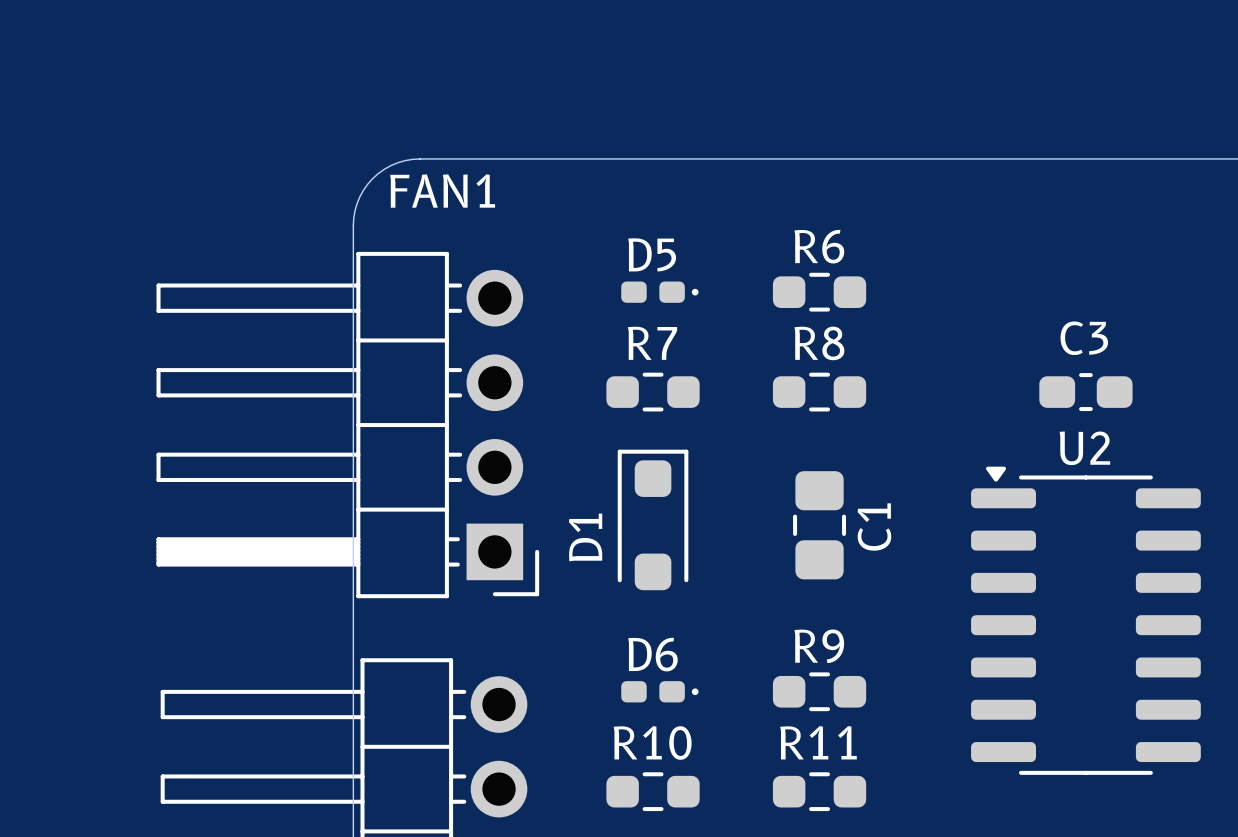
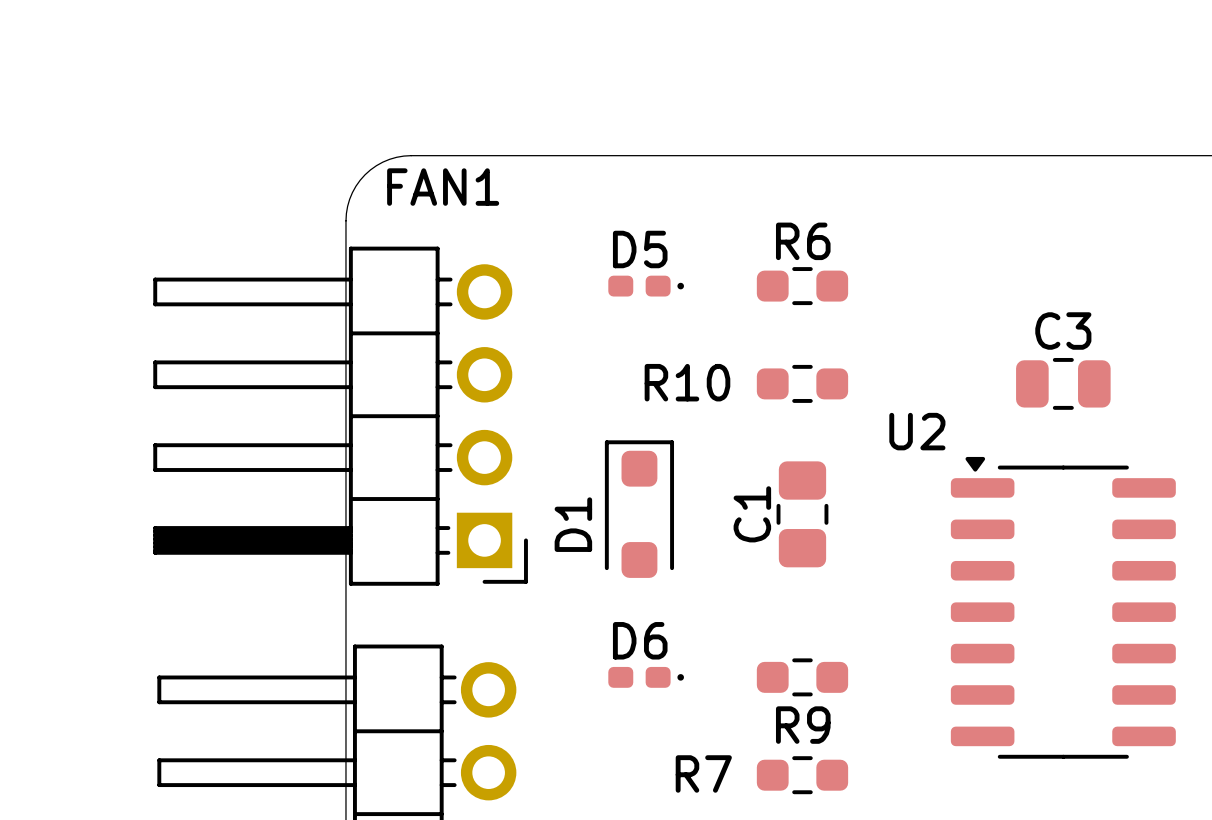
R8 name: R8 (819, 343) -> R10 (687, 382)
C3 footprint: [1039, 373, 1133, 412] -> [1016, 357, 1111, 410]
R7: (653, 392) -> none
U2 name position: U2 (1084, 448) -> U2 (917, 431)
C1 name position: C1 (874, 527) -> C1 (752, 514)
R9 name position: R9 (819, 646) -> R9 (803, 725)
R11 name: R11 (818, 742) -> R7 (703, 773)
R10: (653, 791) -> none

